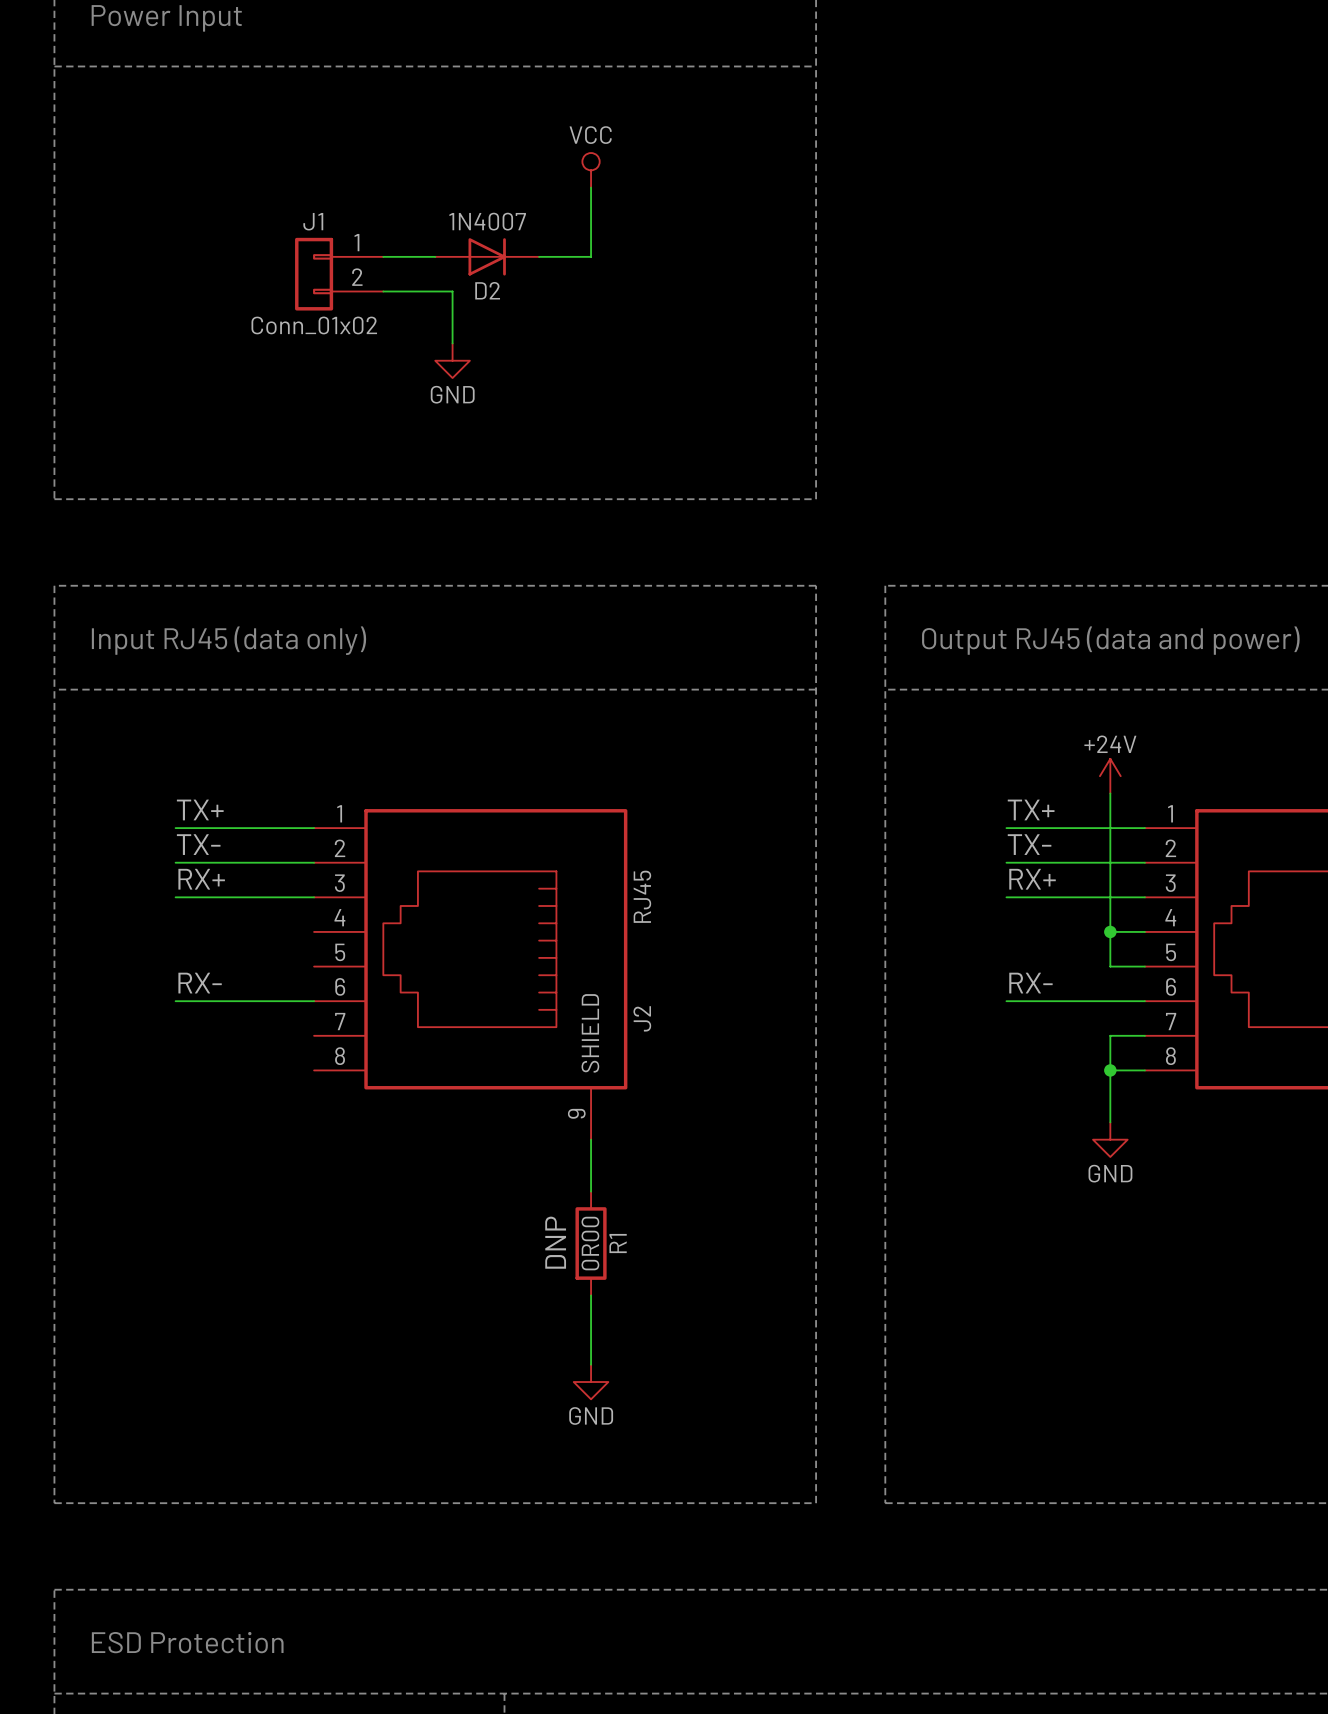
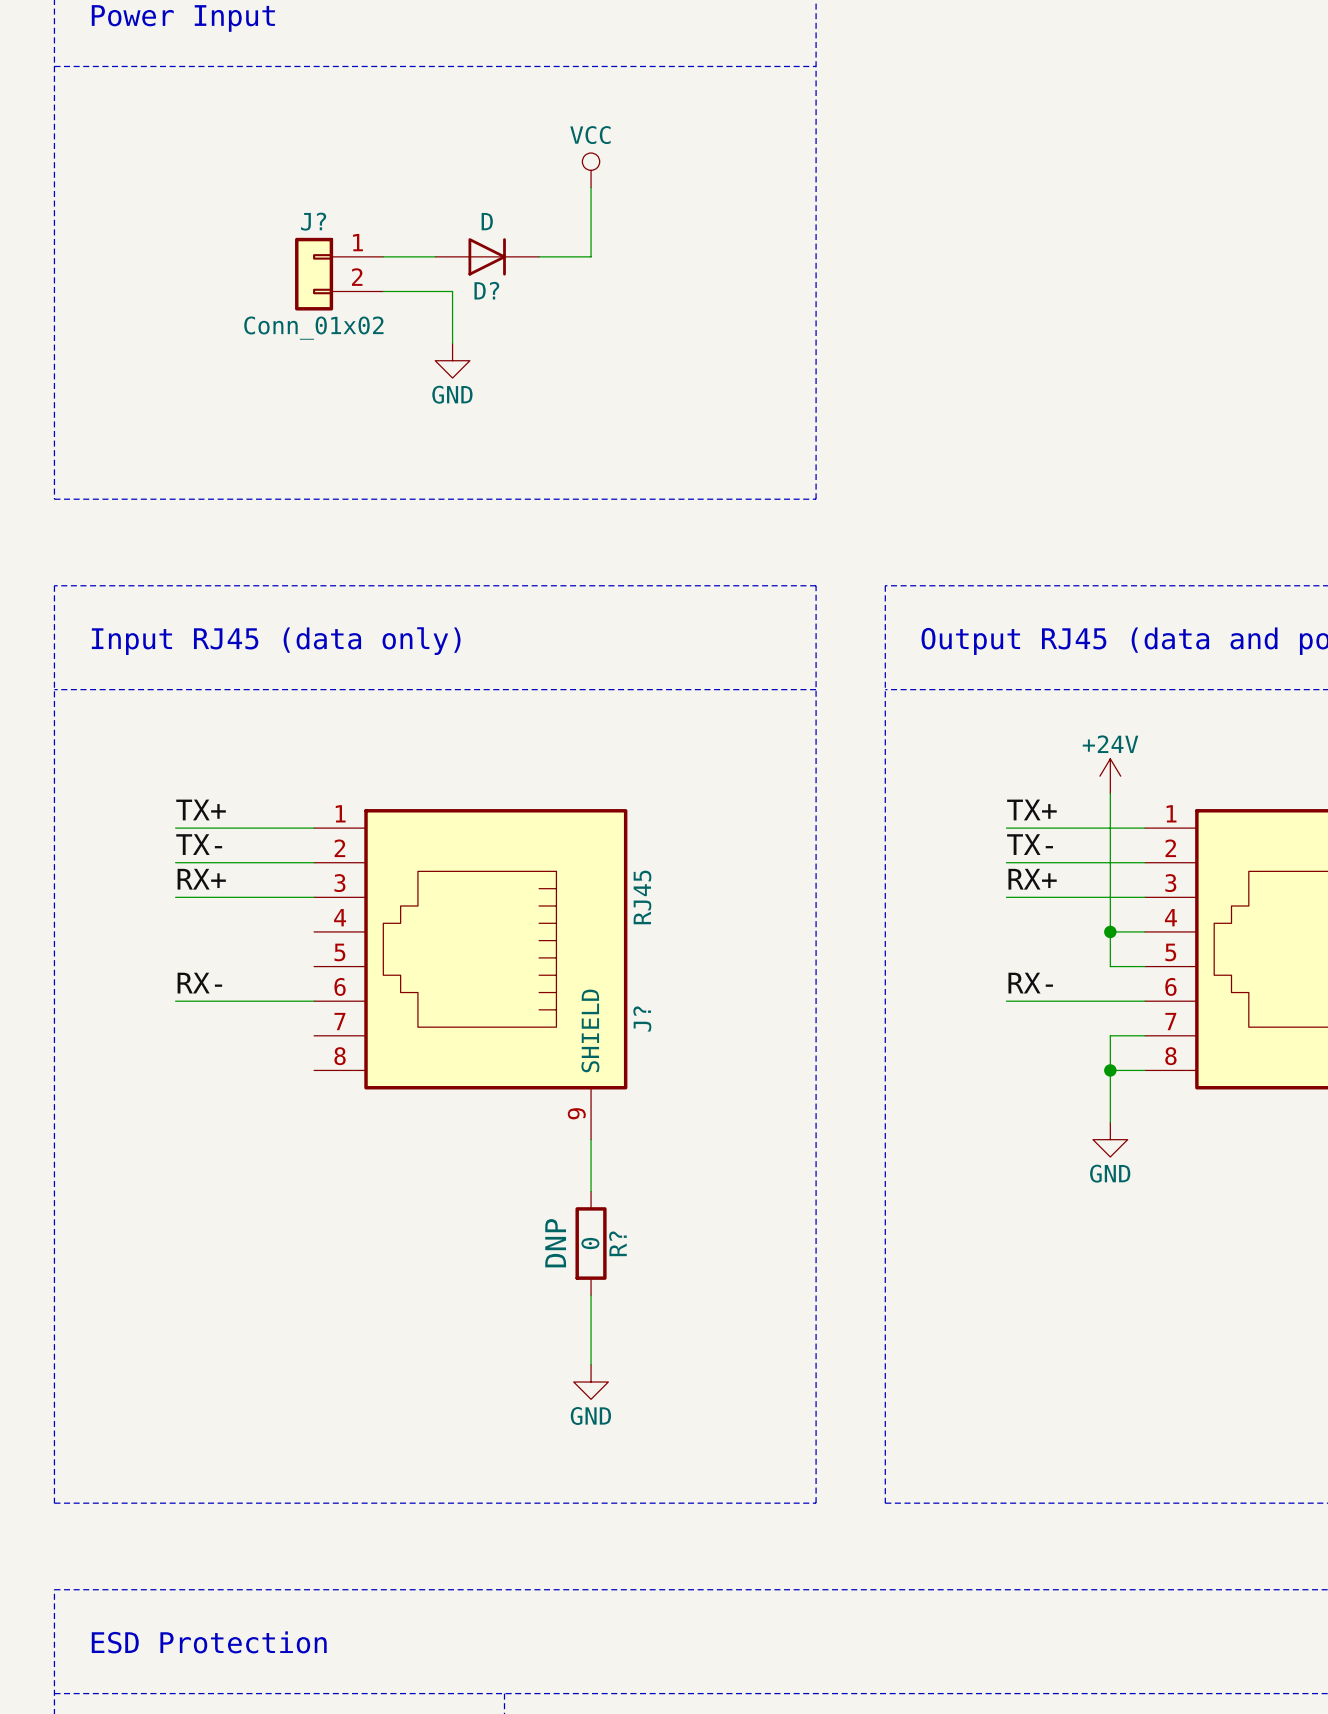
J1 name: J1 (313, 221) -> J? (313, 221)
D2 value: 1N4007 (487, 221) -> D (487, 221)
D2 name: D2 (487, 290) -> D? (486, 290)
J2 name: J2 (642, 1018) -> J? (642, 1018)
R1 value: 0R00 (590, 1243) -> 0 (590, 1243)
R1 name: R1 (618, 1243) -> R? (617, 1243)

